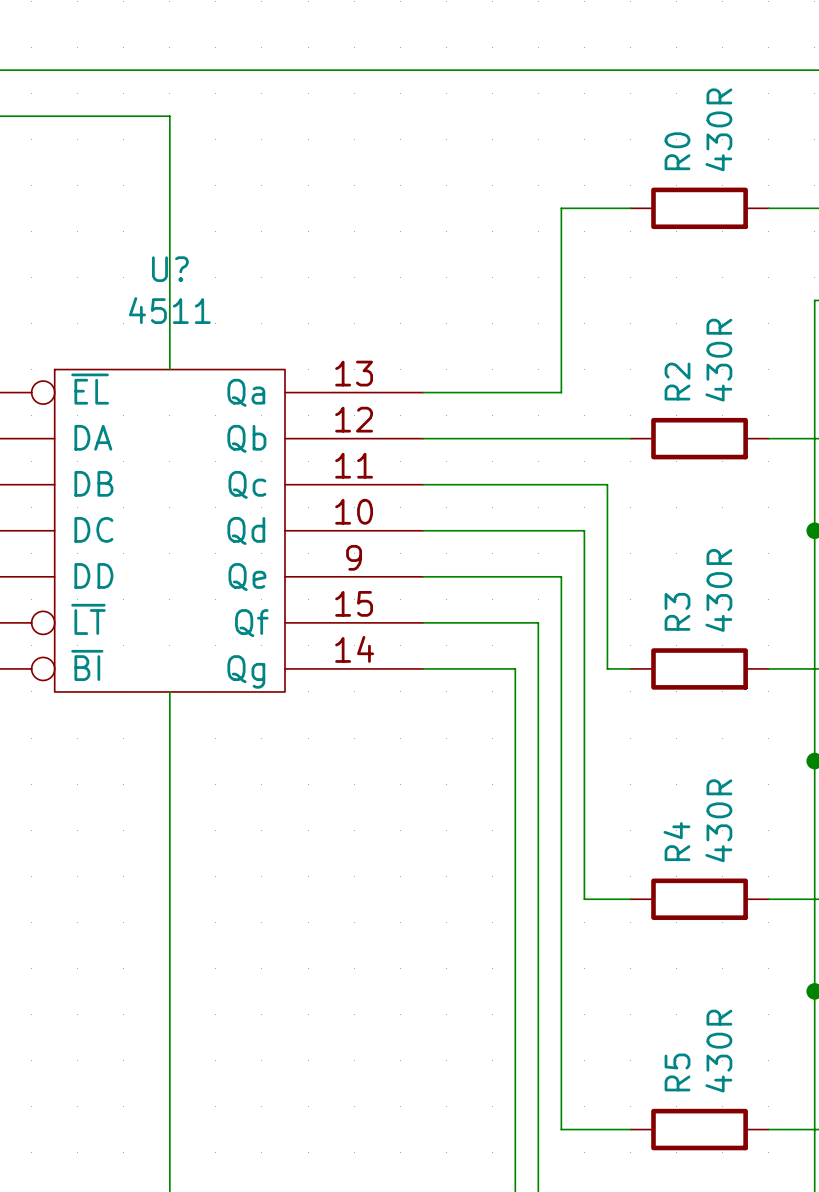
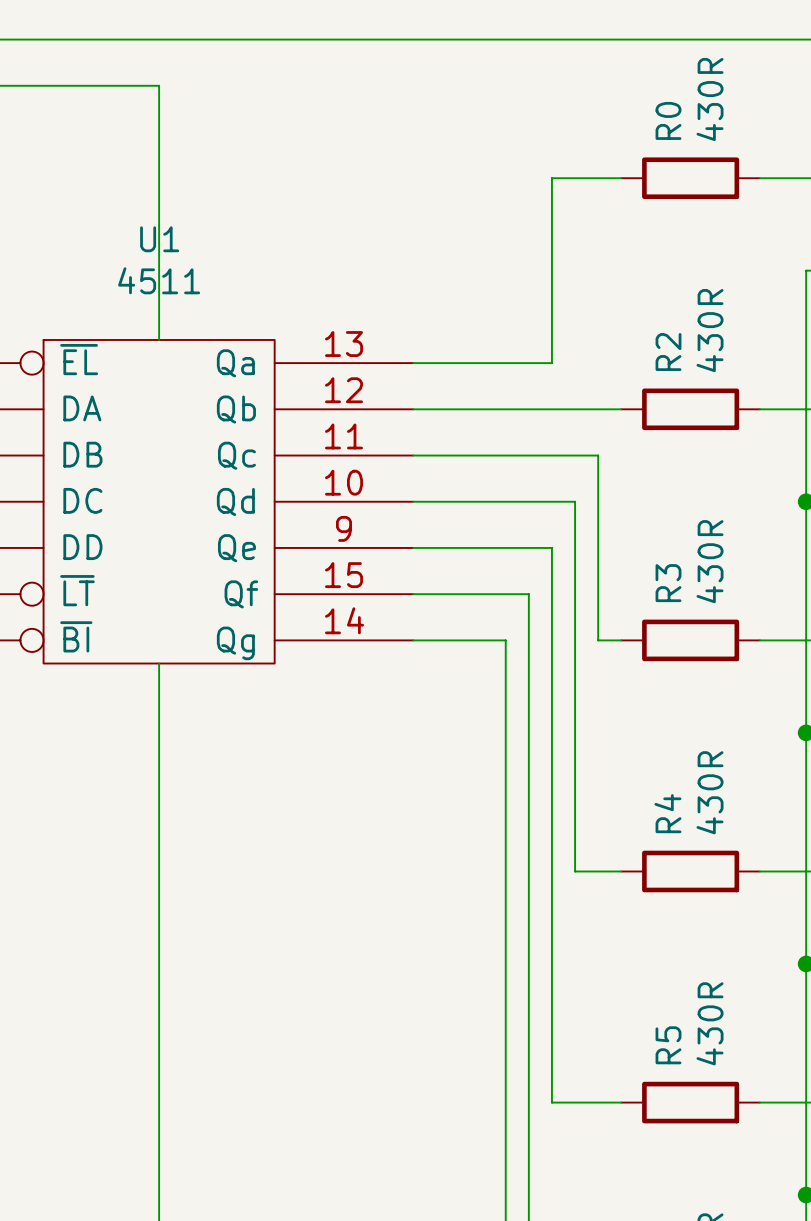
U? name: U? (170, 269) -> U1 (159, 239)

